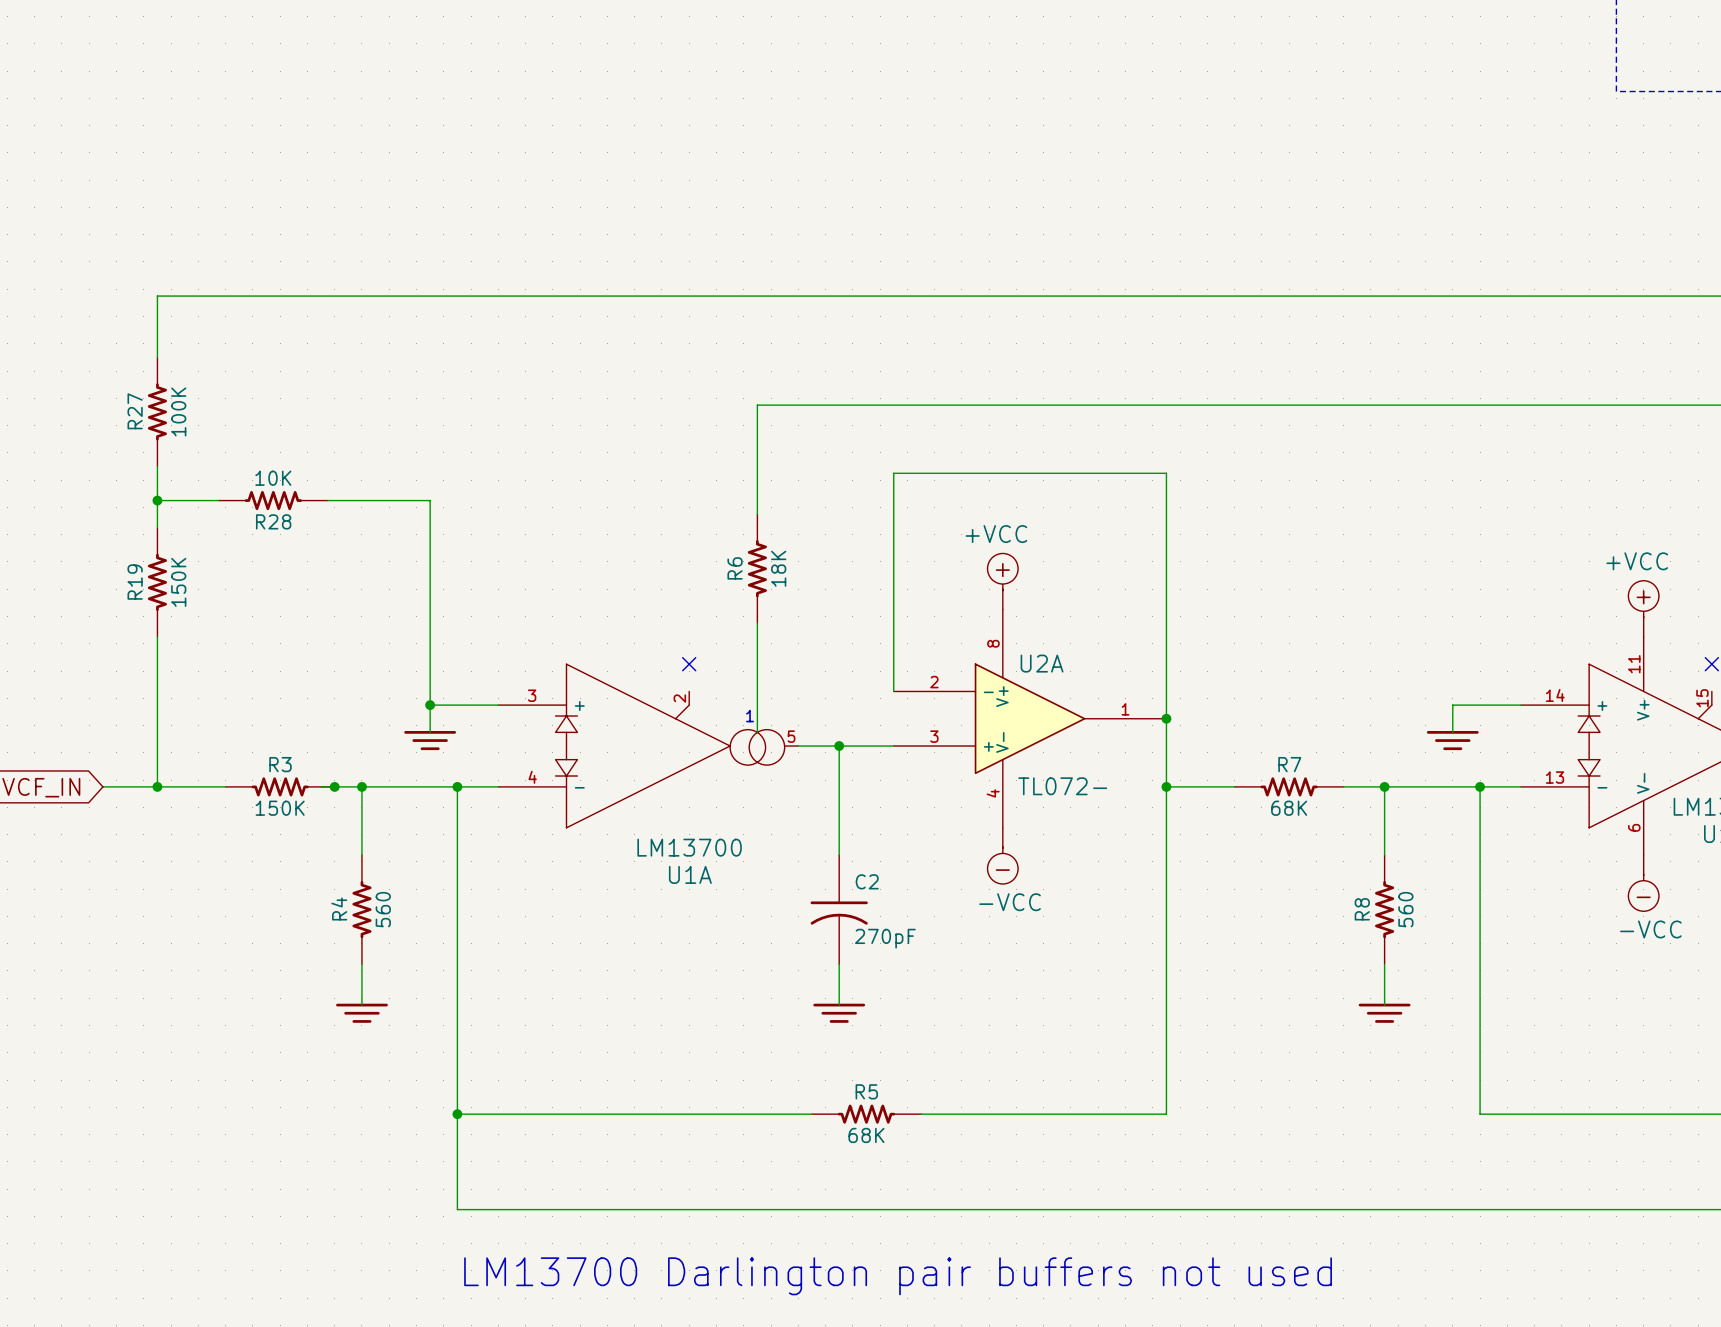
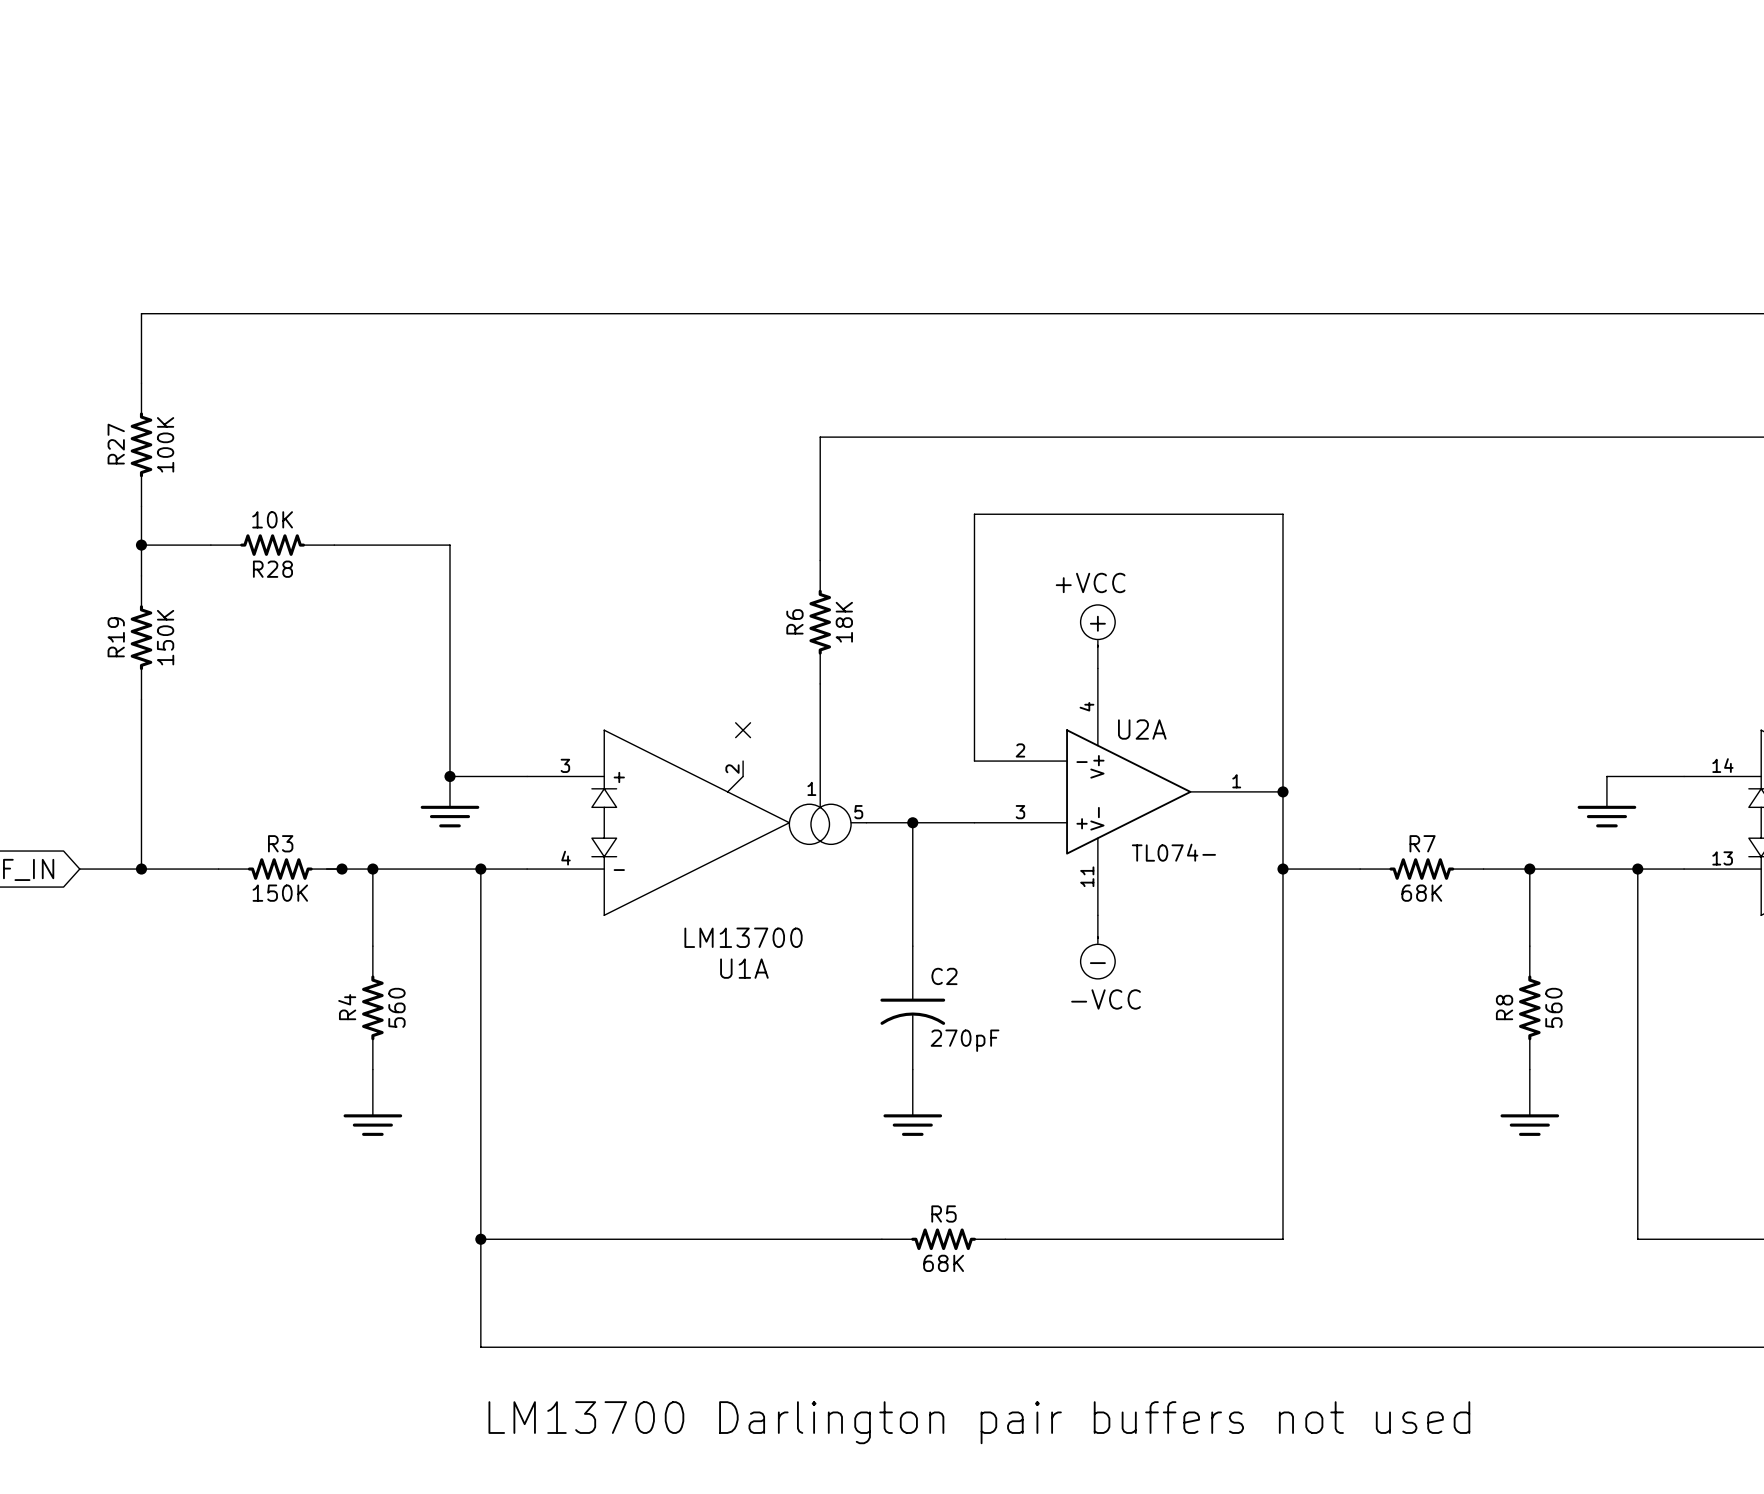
U2A pin number: 8 (993, 643) -> 4 (1086, 706)
U2A value: TL072- (1062, 786) -> TL074- (1173, 852)
U2A pin number: 4 (993, 793) -> 11 (1087, 876)

